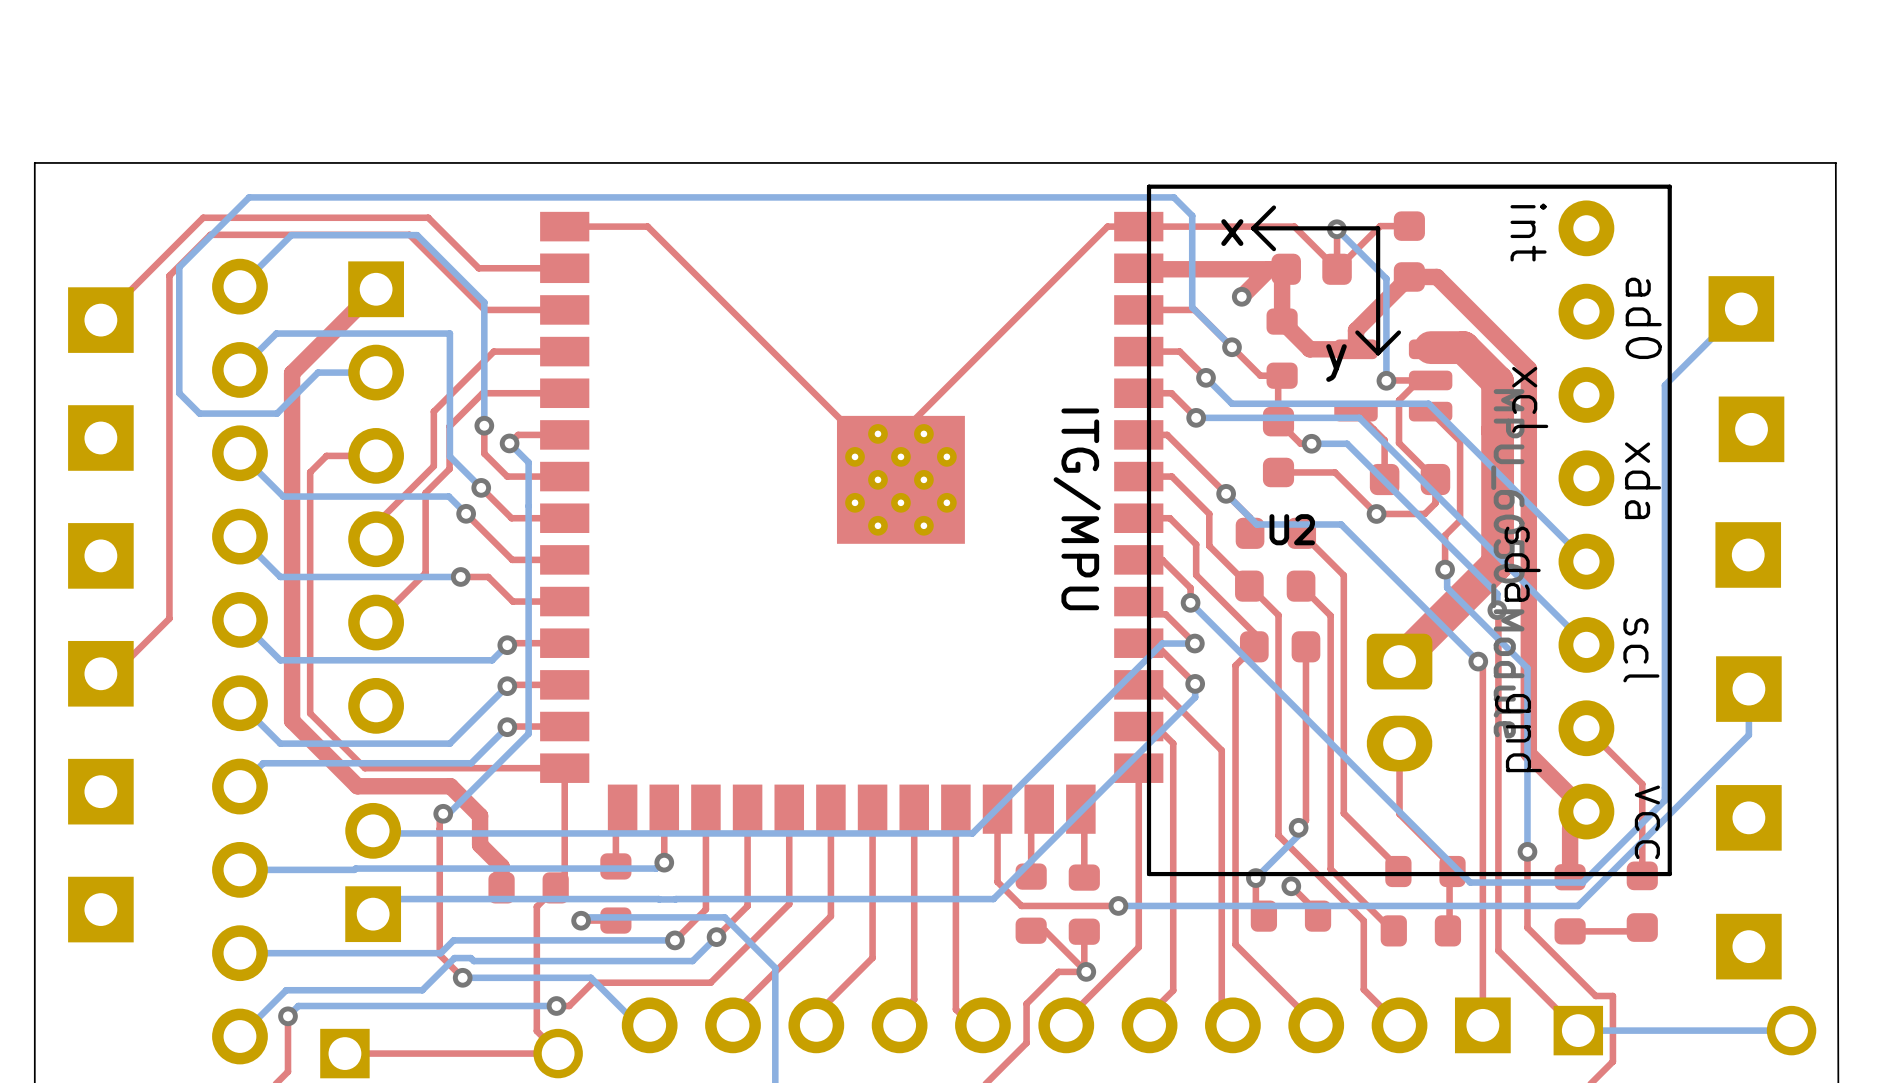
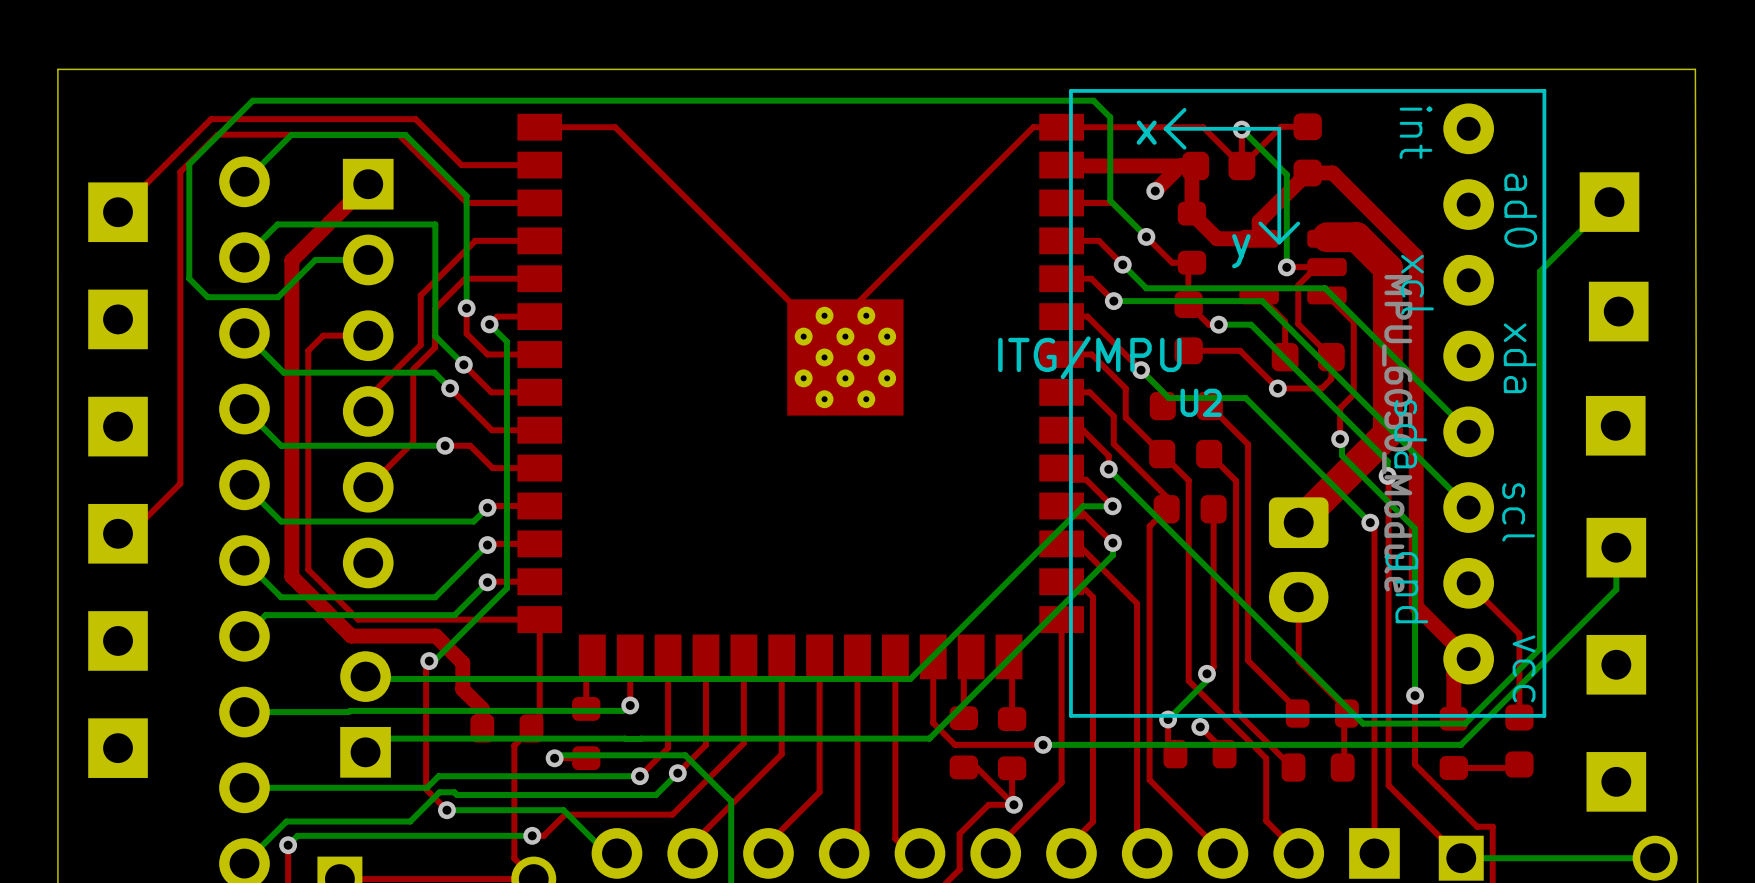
U2 text rotation: 0° (1077, 509) -> 90° counterclockwise (1089, 357)

